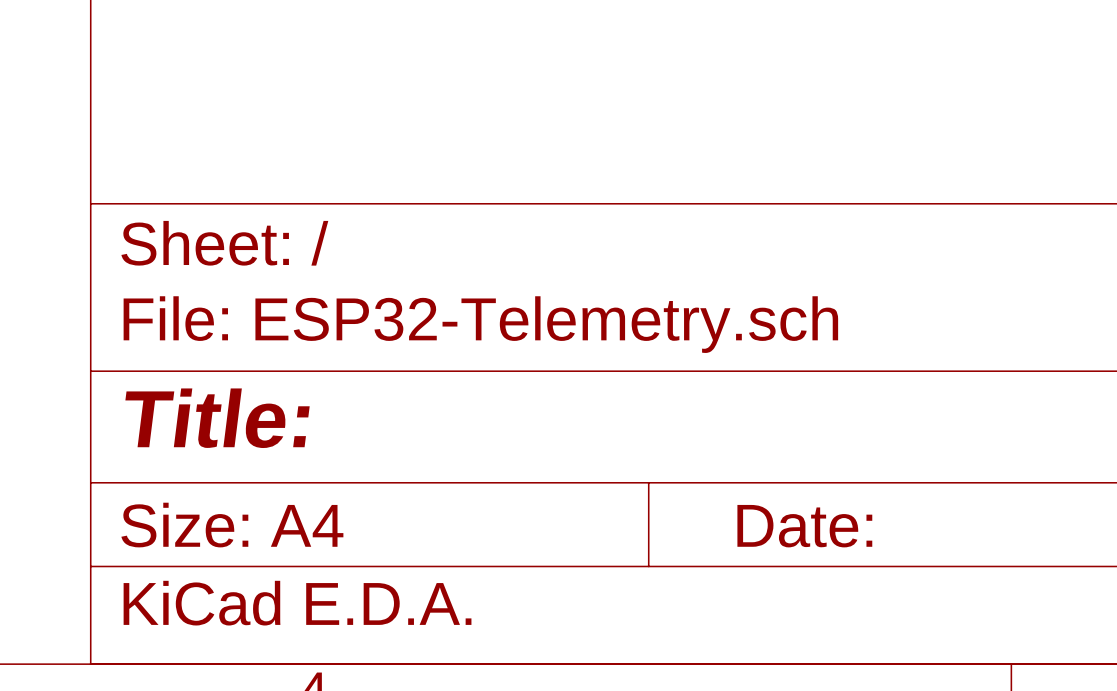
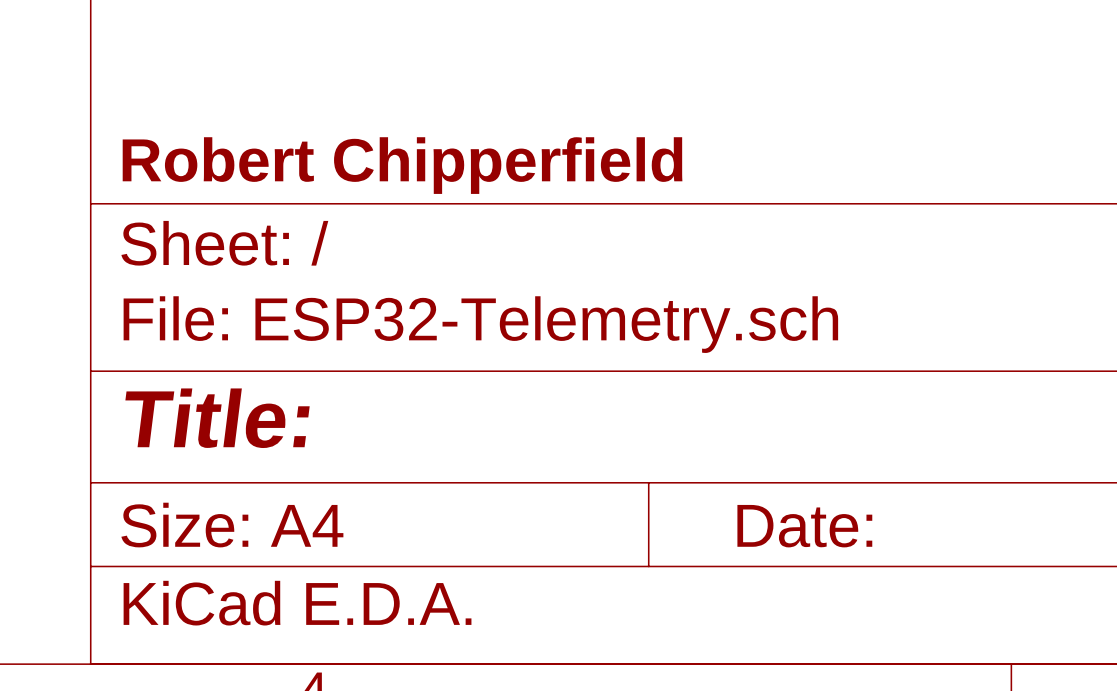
title block: none -> Robert Chipperfield (402, 165)

